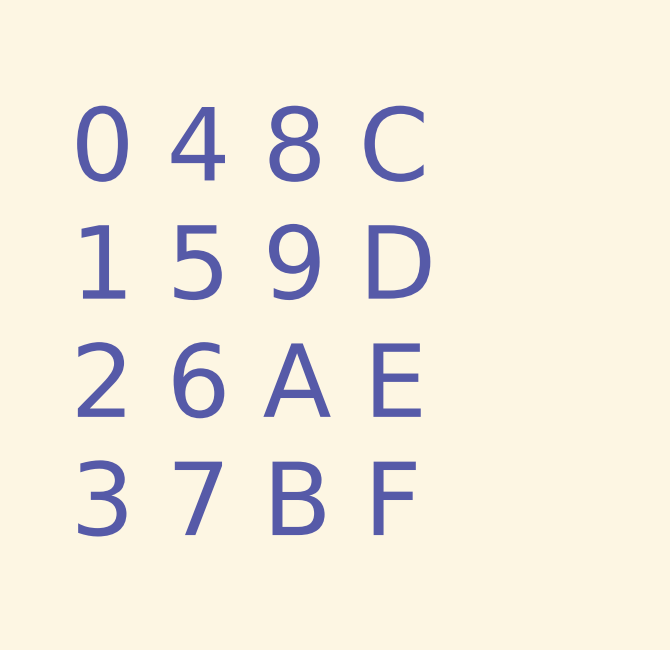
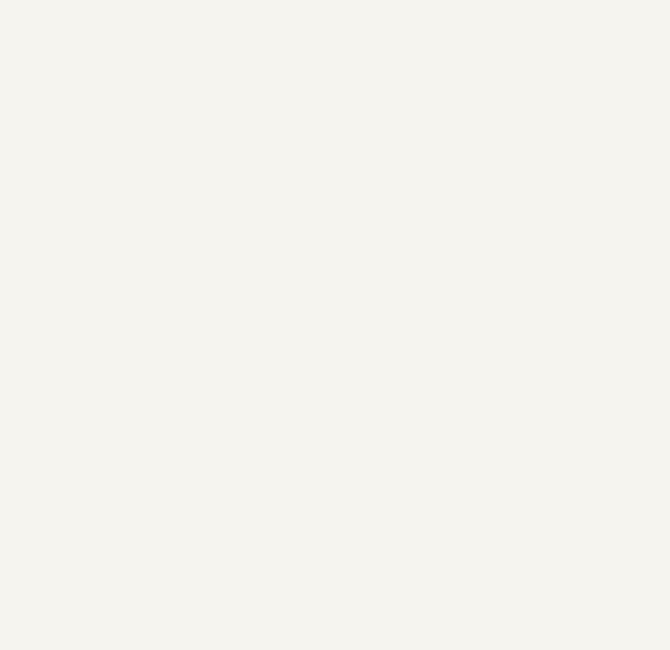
text: 0 4 8 C (250, 143) -> none
text: 1 5 9 D (255, 261) -> none
text: 2 6 A E (249, 380) -> none
text: 3 7 B F (246, 498) -> none

